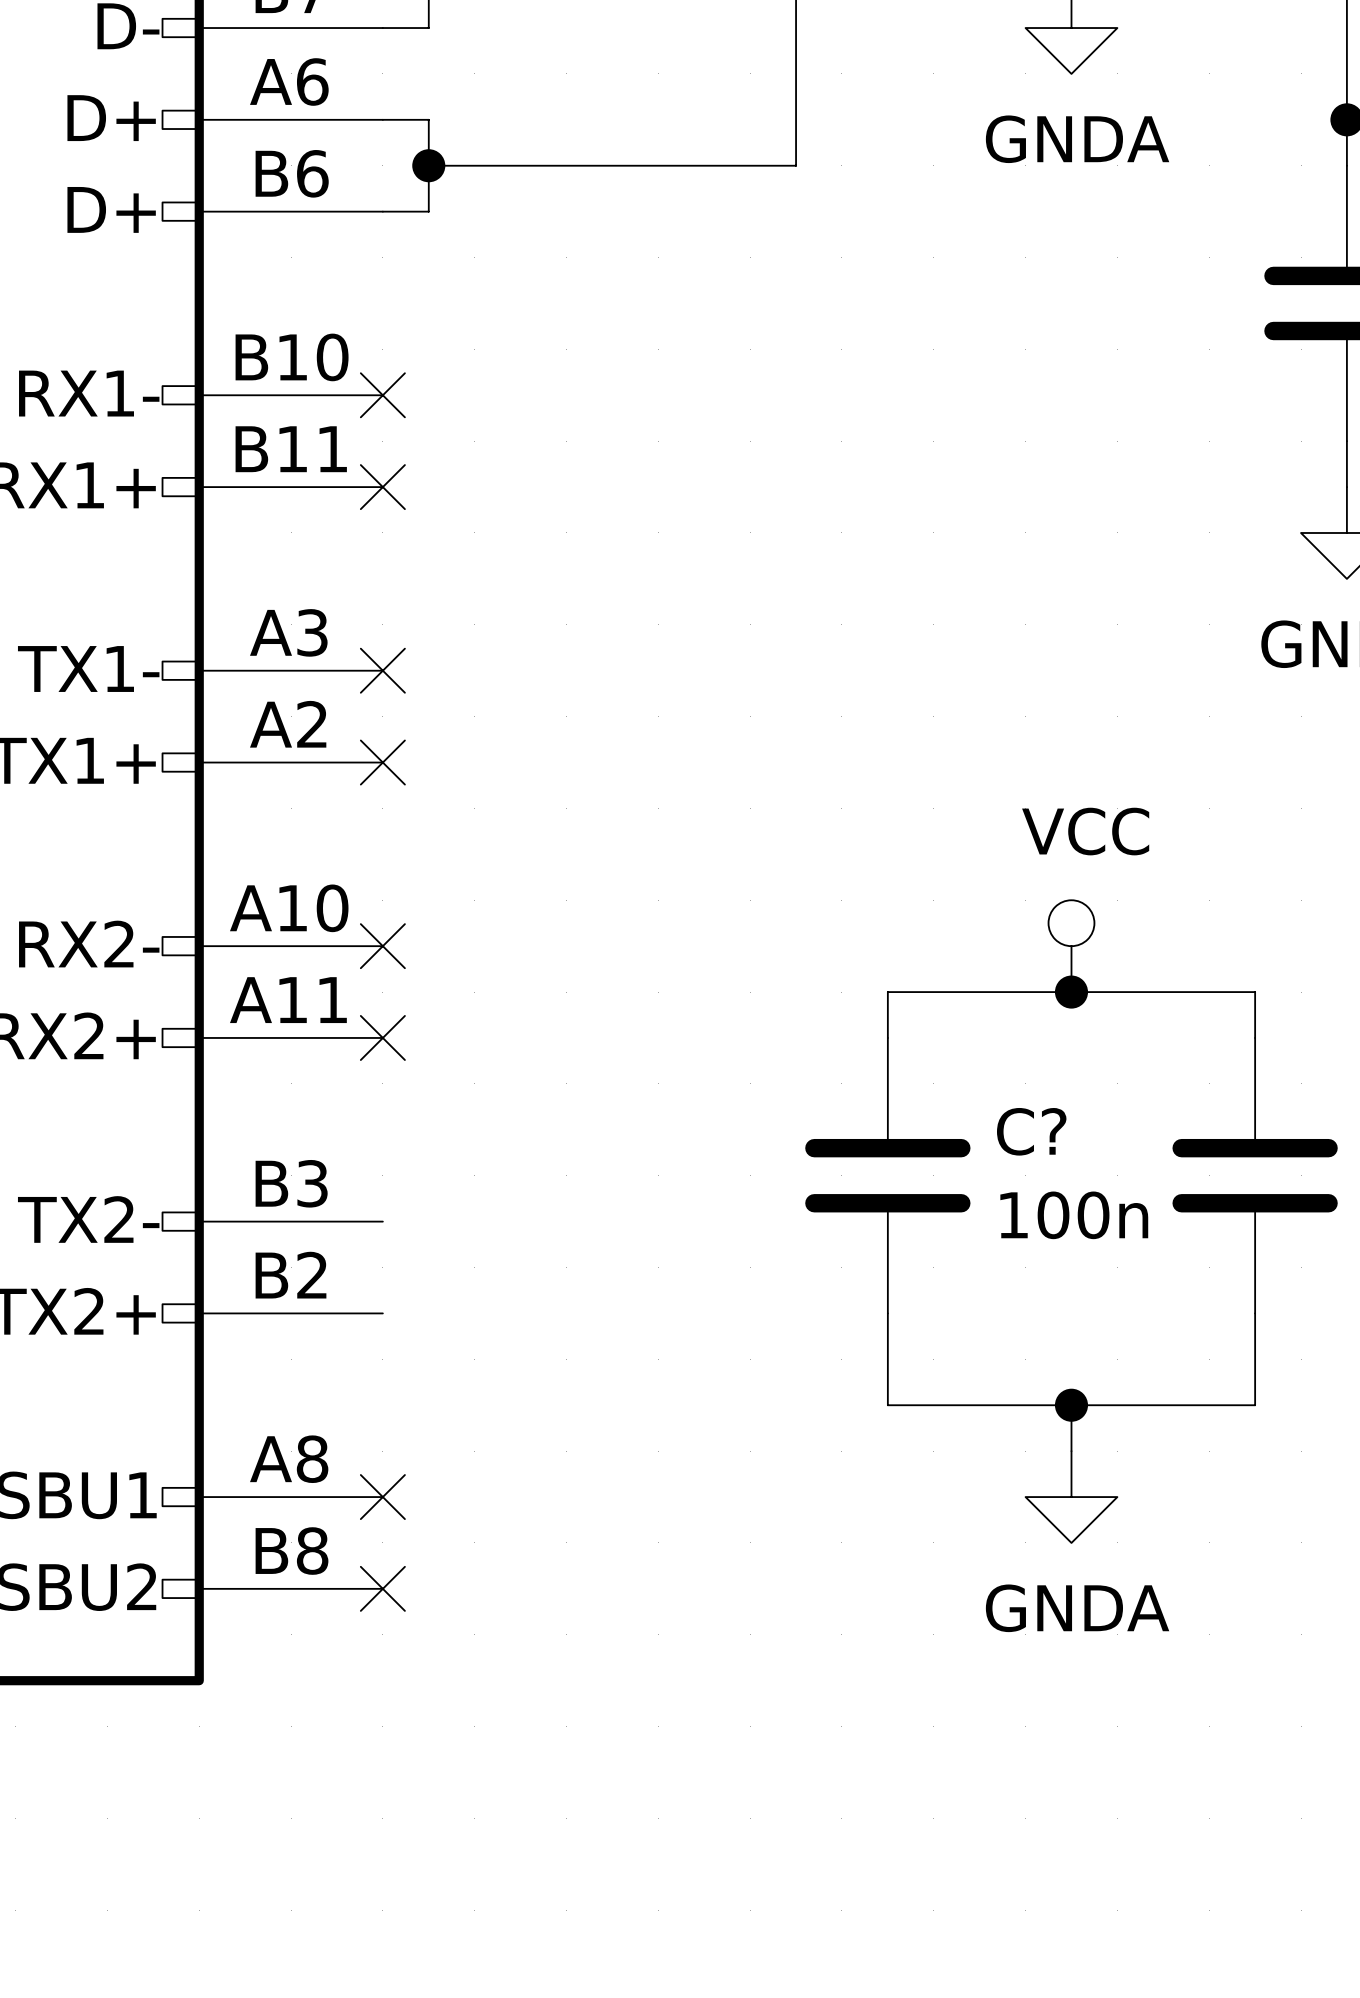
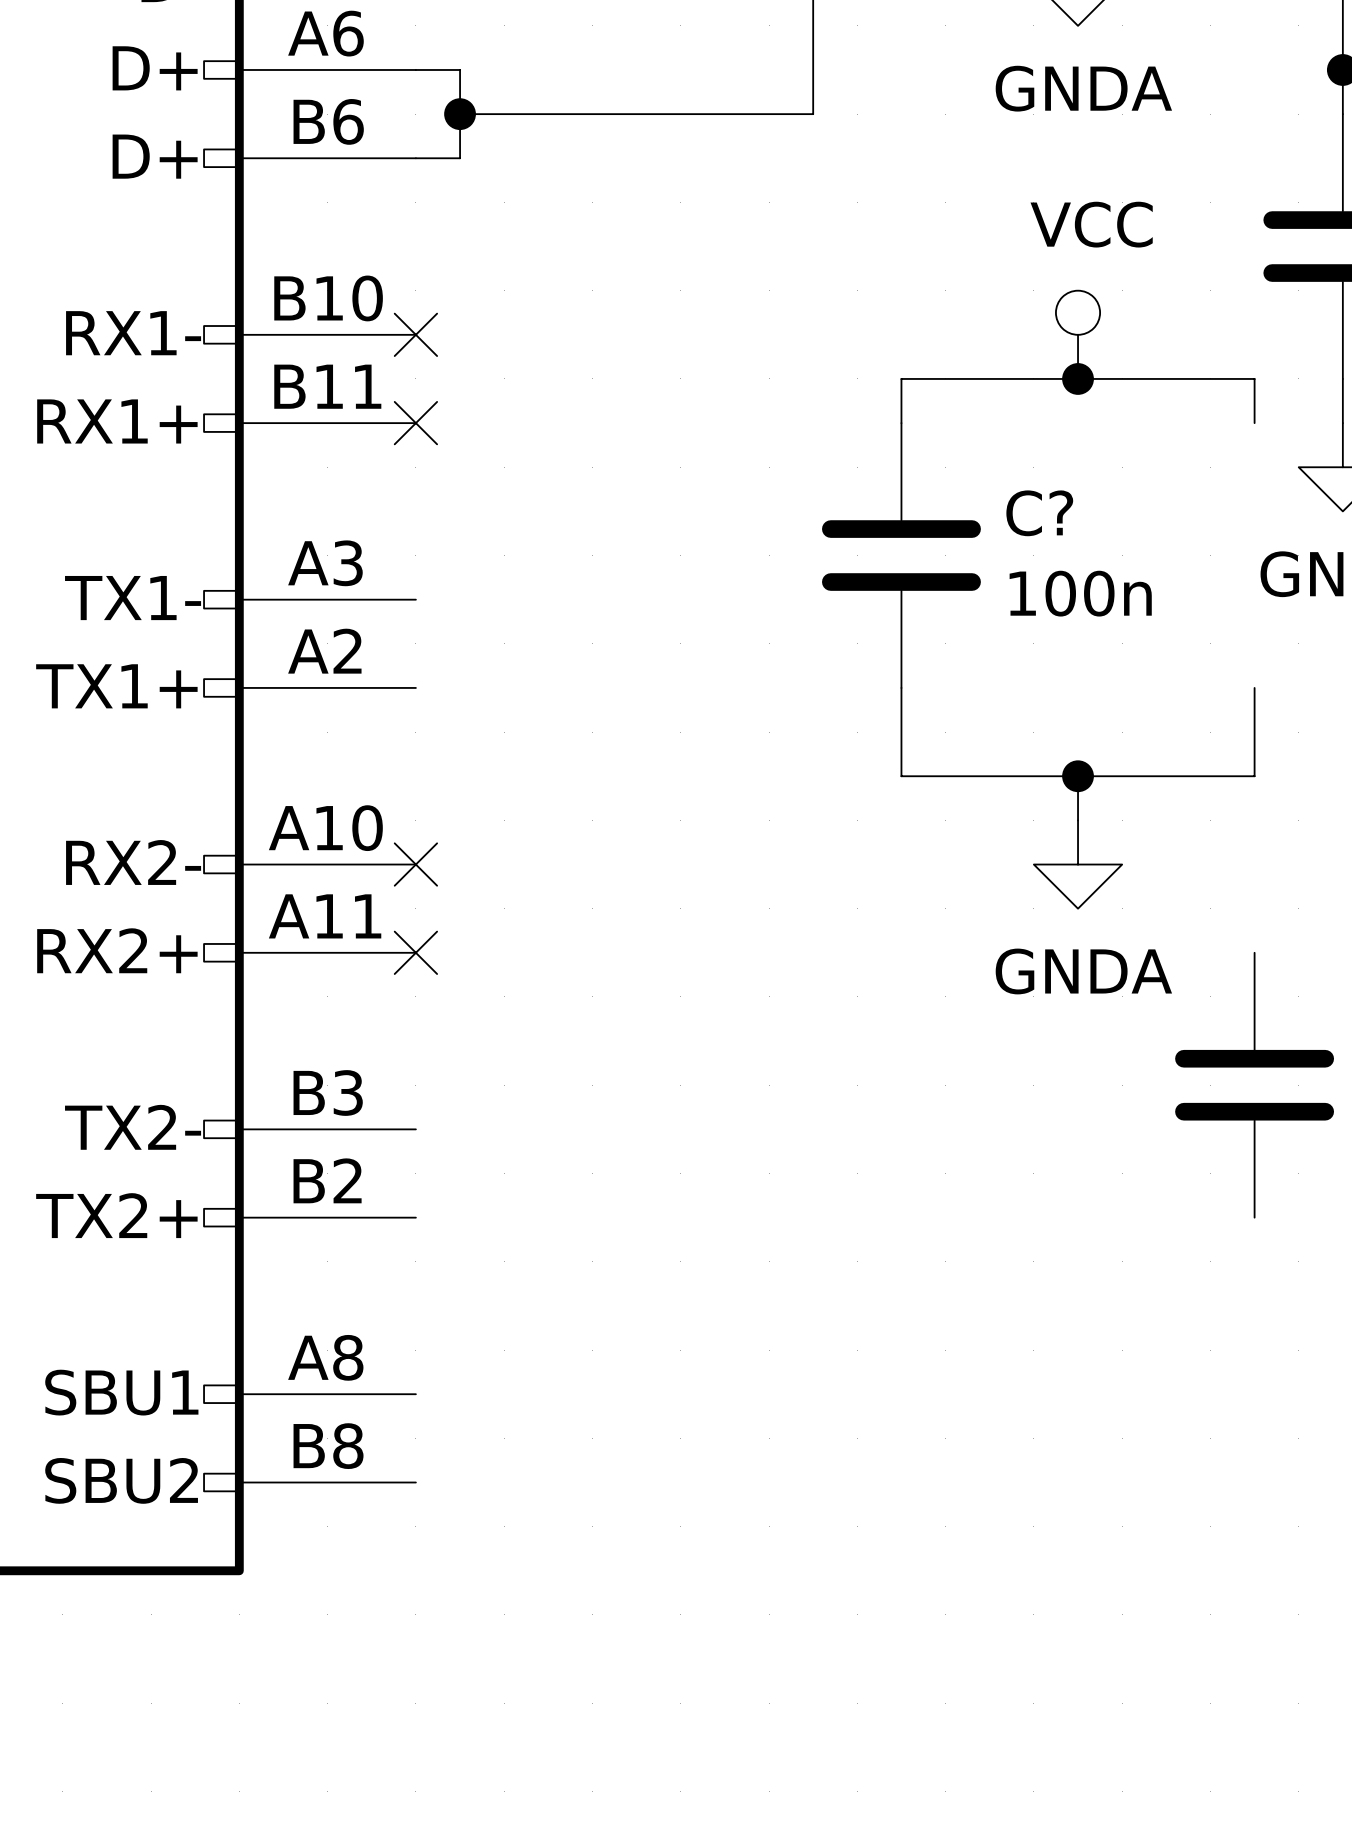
power symbol: none -> VCC (1078, 334)
junction: none -> (1078, 378)
no-connect mark: (382, 670) -> none
no-connect mark: (382, 762) -> none
power symbol: VCC (1071, 946) -> GNDA (1078, 864)
junction position: (1071, 992) -> (1078, 776)
wire: (887, 1037) (887, 992) (1255, 992) (1255, 1037) -> (901, 423) (901, 378) (1254, 378) (1254, 423)
C? position: (887, 1175) -> (901, 555)
wire: (887, 1313) (887, 1405) (1255, 1405) (1255, 1313) -> (901, 687) (901, 776) (1254, 776) (1254, 687)
wire: (1071, 1405) (1071, 1451) -> (1078, 776) (1078, 820)
junction: (1071, 1405) -> none
no-connect mark: (382, 1497) -> none
power symbol: GNDA (1071, 1497) -> none
no-connect mark: (382, 1588) -> none

